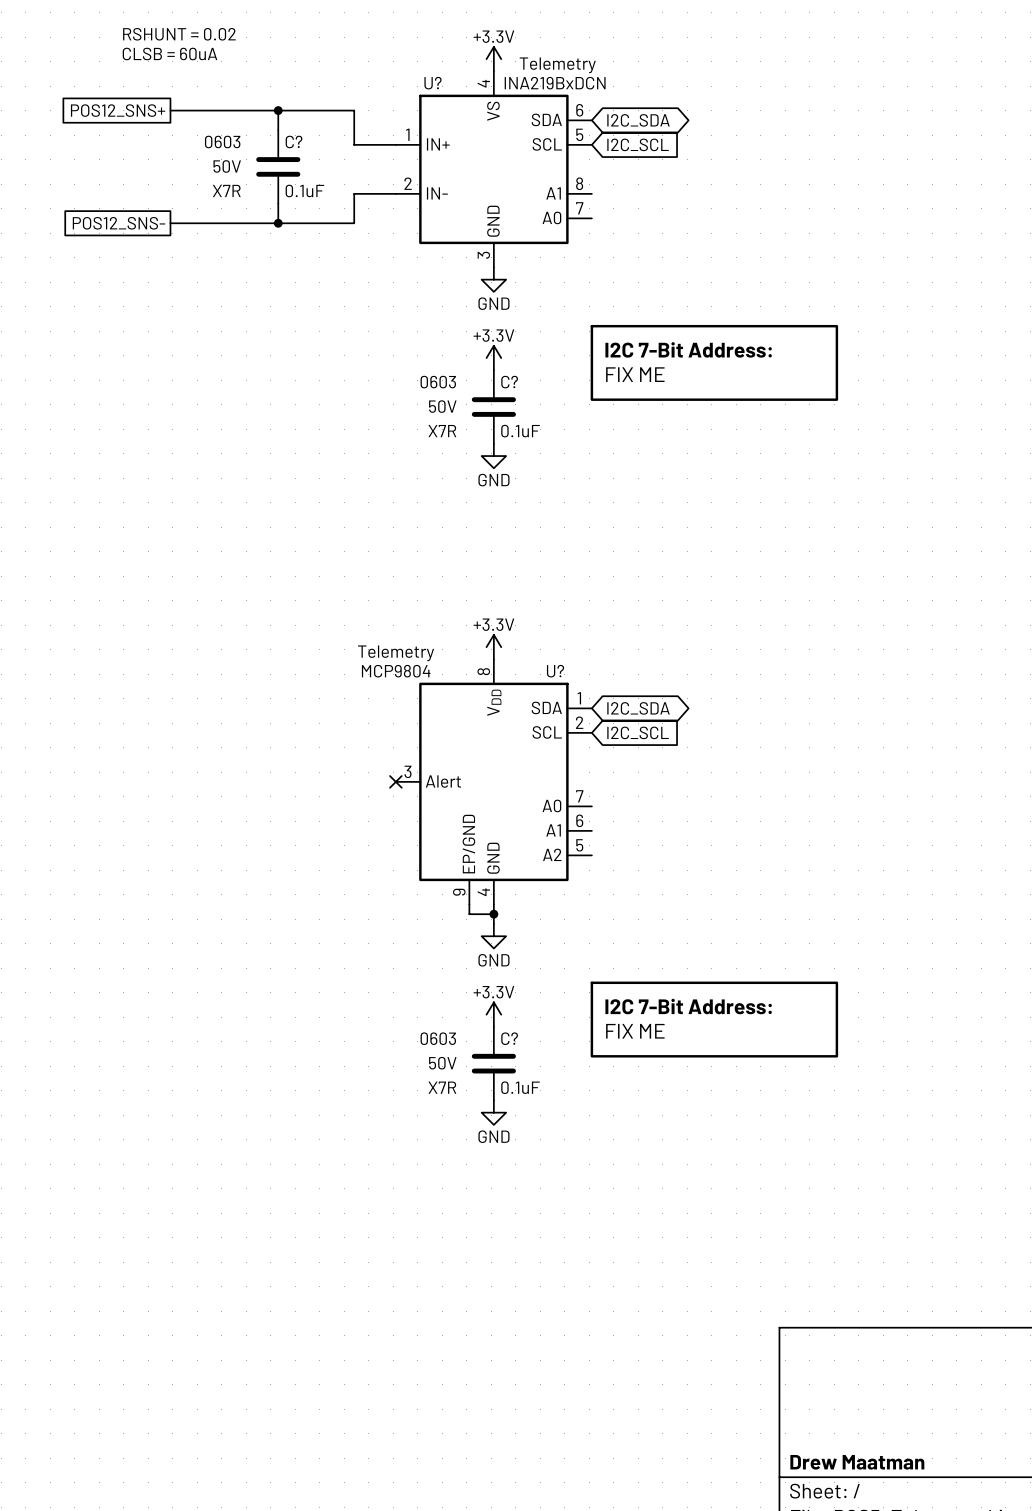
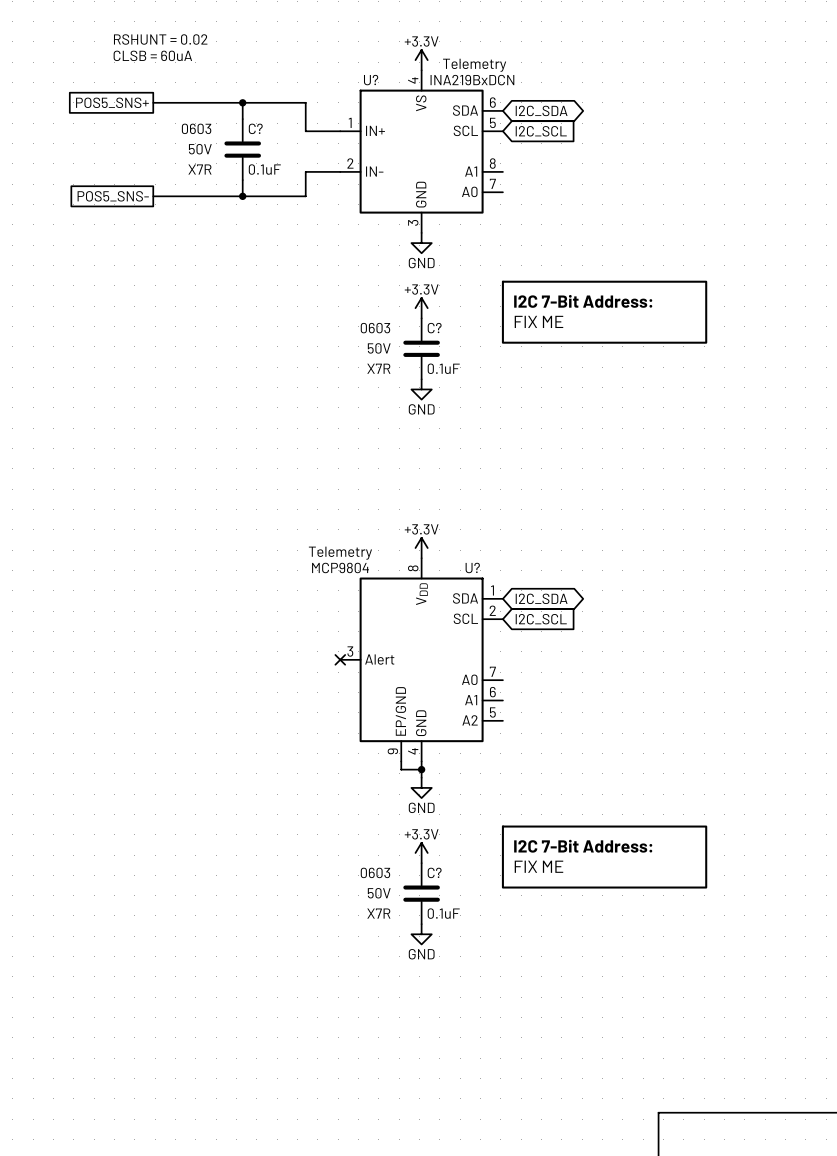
global label: POS12_SNS+ (118, 110) -> POS5_SNS+ (112, 102)
global label: POS12_SNS- (118, 223) -> POS5_SNS- (113, 196)

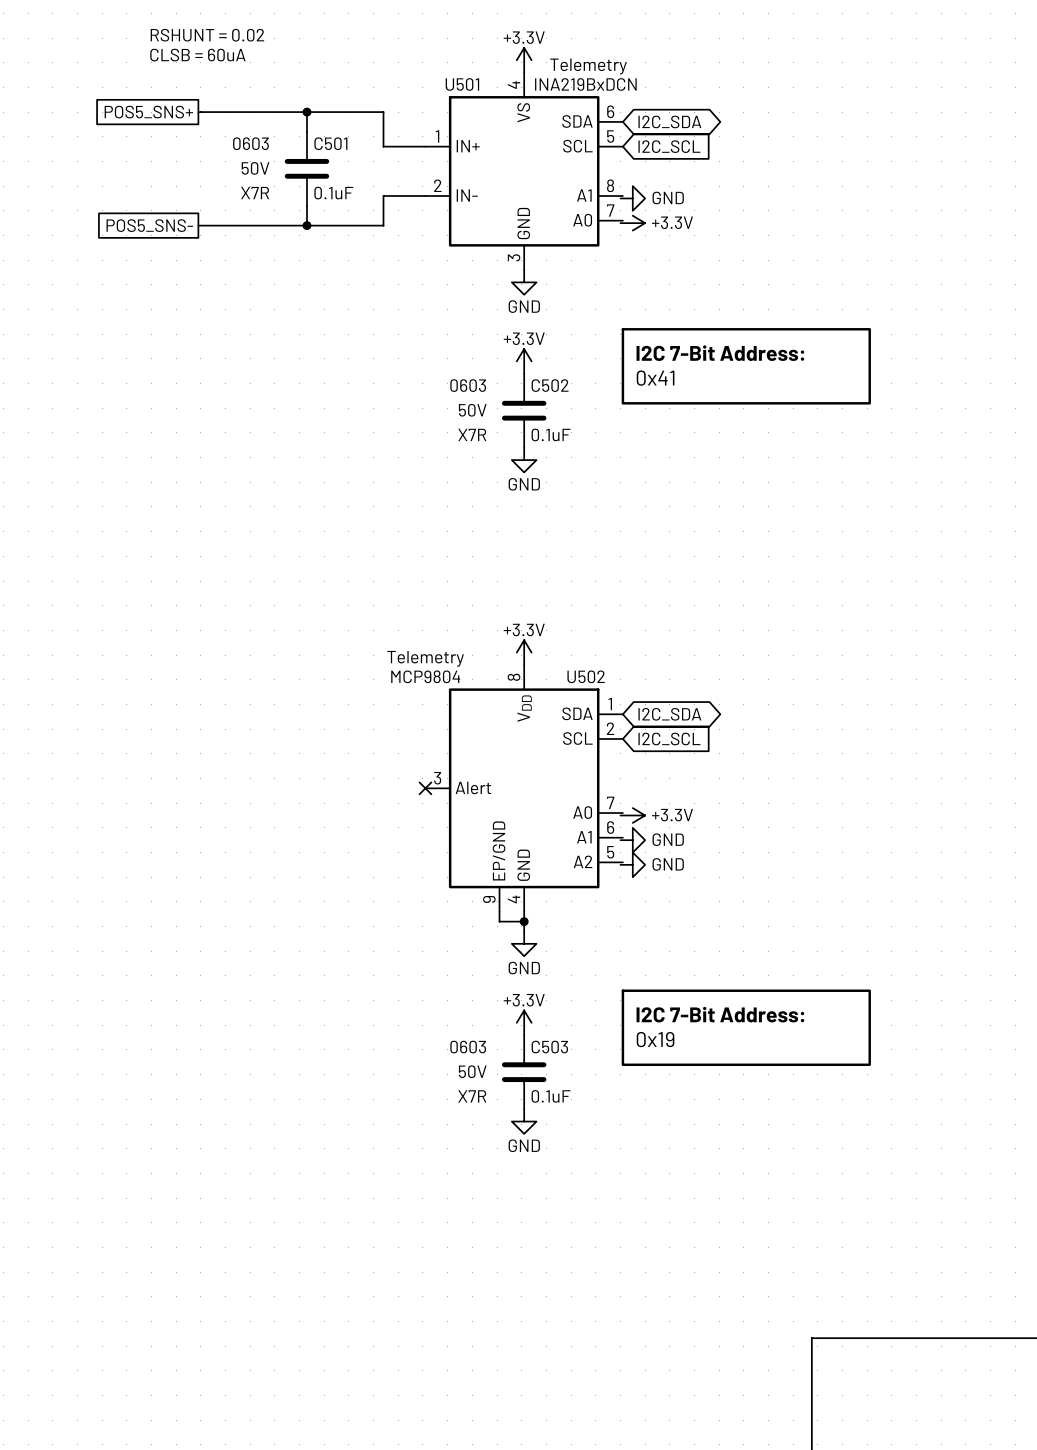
U? name: U? (371, 80) -> U501 (462, 84)
C? name: C? (255, 128) -> C501 (330, 143)
power symbol: none -> GND (632, 198)
power symbol: none -> +3.3V (632, 223)
part value: FIX ME (538, 321) -> 0x41 (655, 378)
C? name: C? (434, 328) -> C502 (550, 385)
U? name: U? (472, 567) -> U502 (586, 676)
power symbol: none -> +3.3V (632, 815)
power symbol: none -> GND (632, 840)
power symbol: none -> GND (632, 864)
part value: FIX ME (538, 866) -> 0x19 (655, 1039)
C? name: C? (434, 872) -> C503 (549, 1047)

